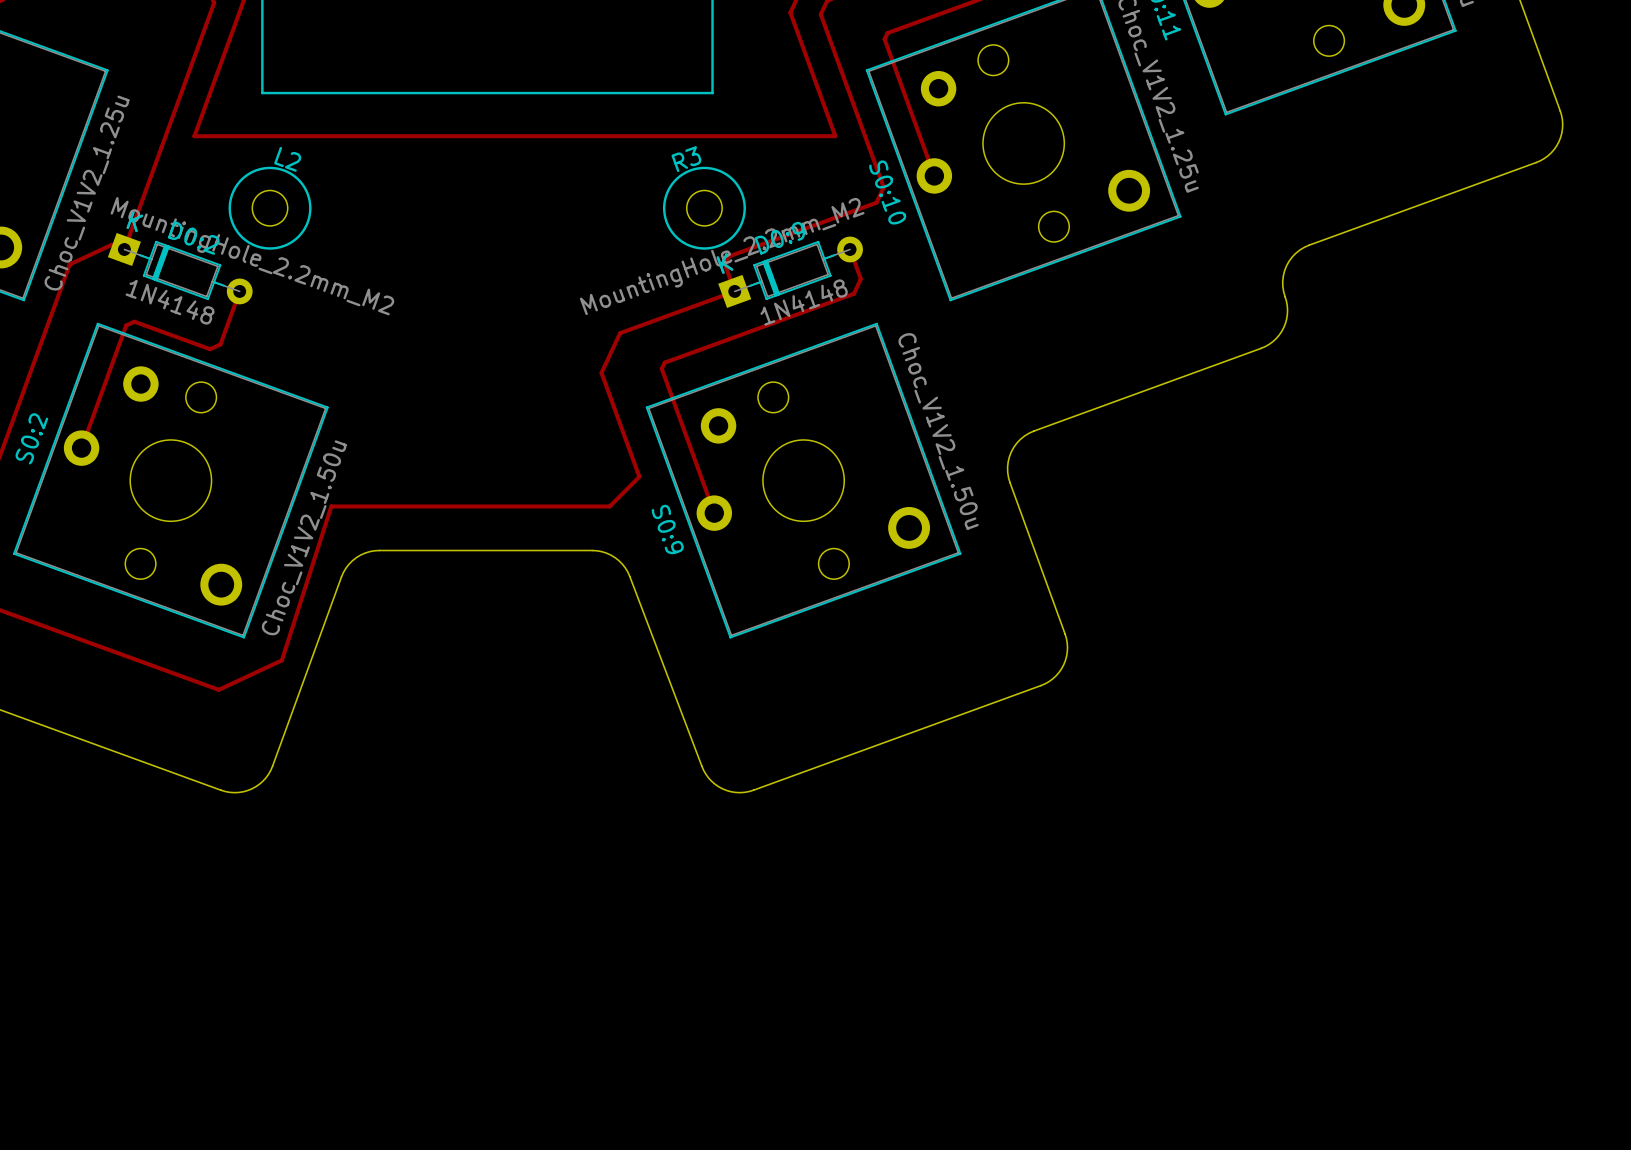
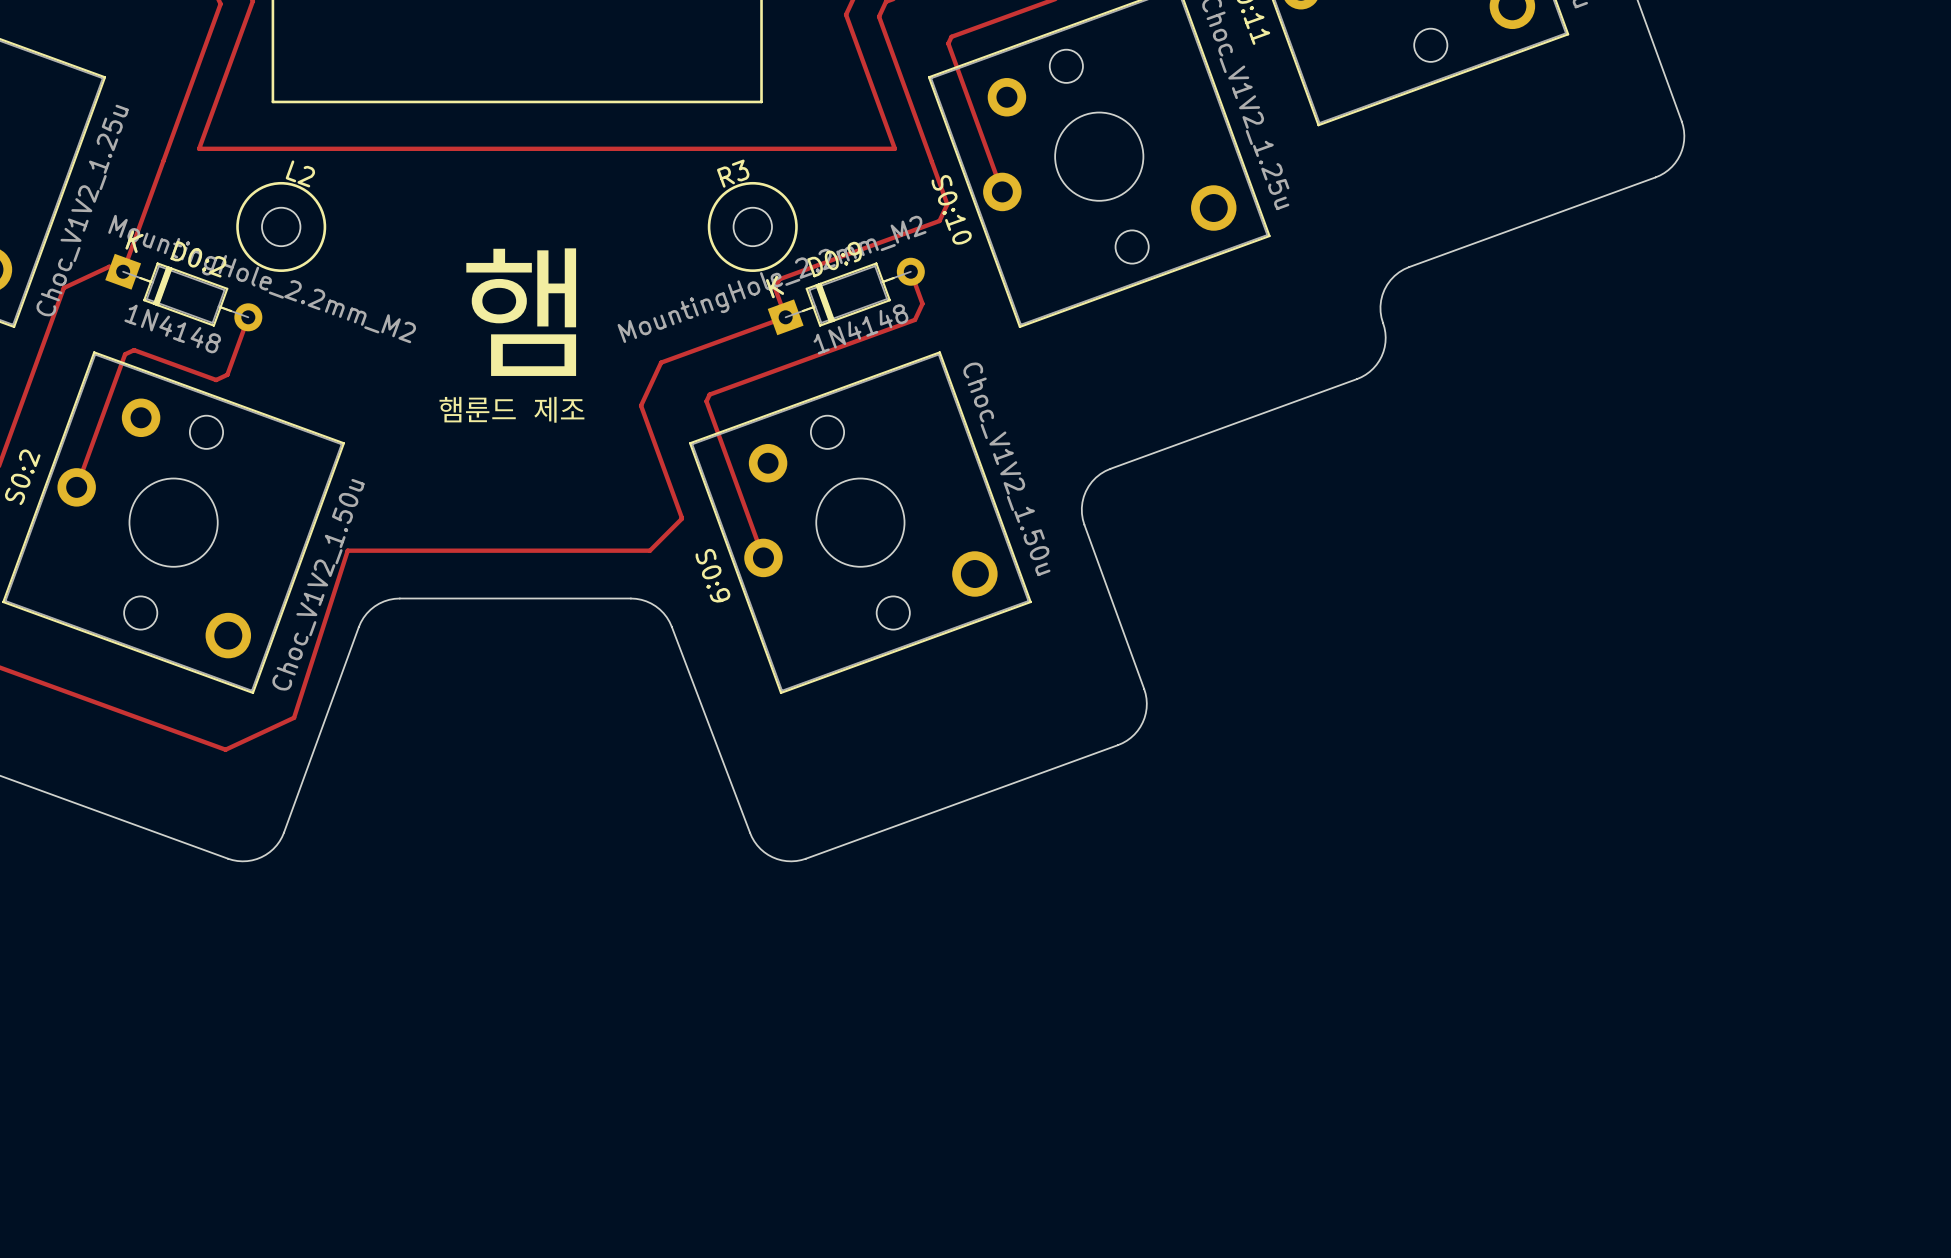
text: none -> 햄 (521, 312)
text: none -> 햄룬드 제조 (511, 409)

